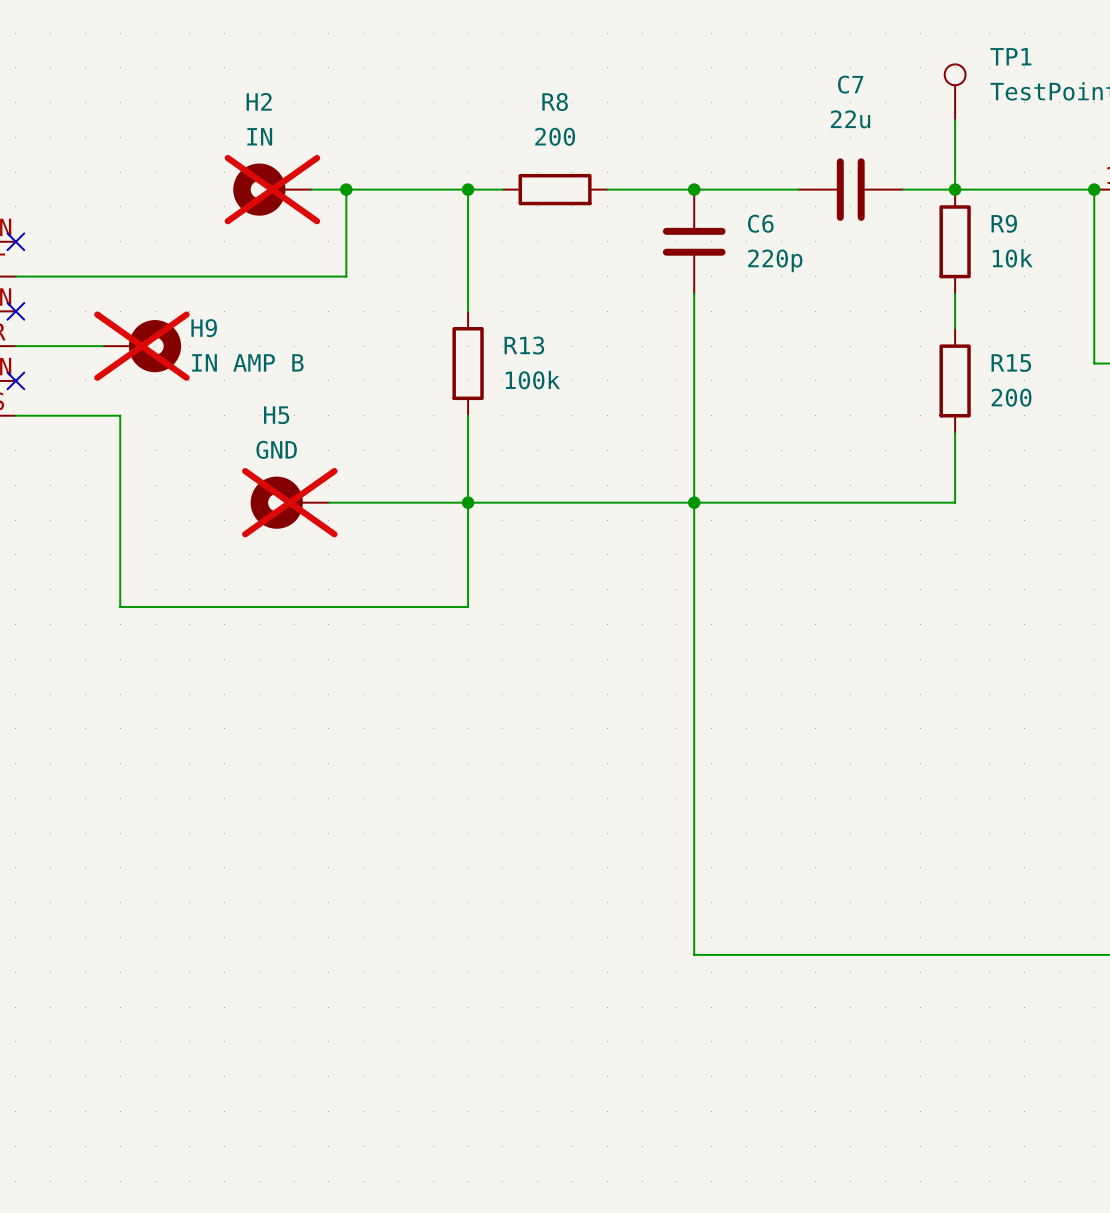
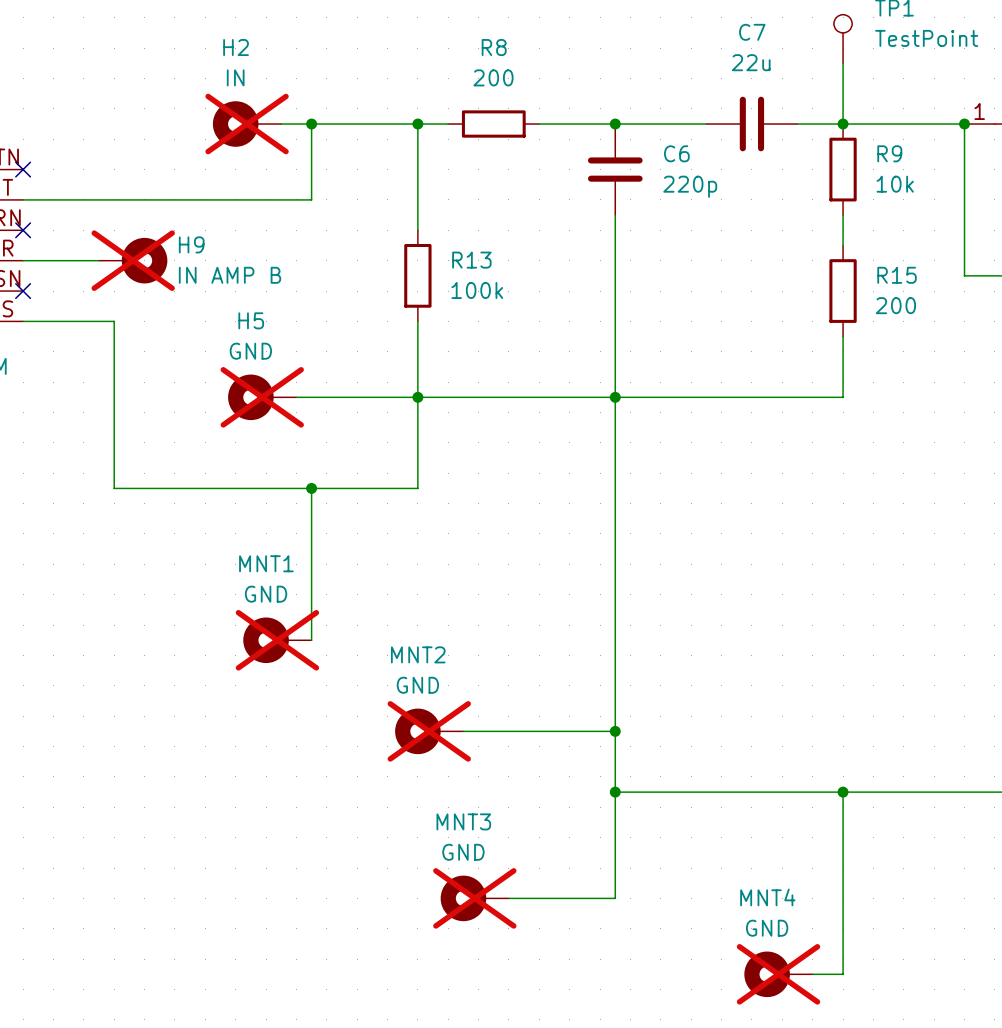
wire: none -> (311, 488) (311, 640)
junction: none -> (311, 488)
MNT1: none -> GND (277, 640)
MNT2: none -> GND (429, 731)
wire: none -> (463, 731) (615, 731)
junction: none -> (615, 731)
wire: none -> (615, 792) (615, 898) (508, 898)
junction: none -> (615, 792)
wire: none -> (843, 792) (843, 974) (812, 974)
junction: none -> (843, 792)
MNT3: none -> GND (474, 898)
MNT4: none -> GND (778, 974)

